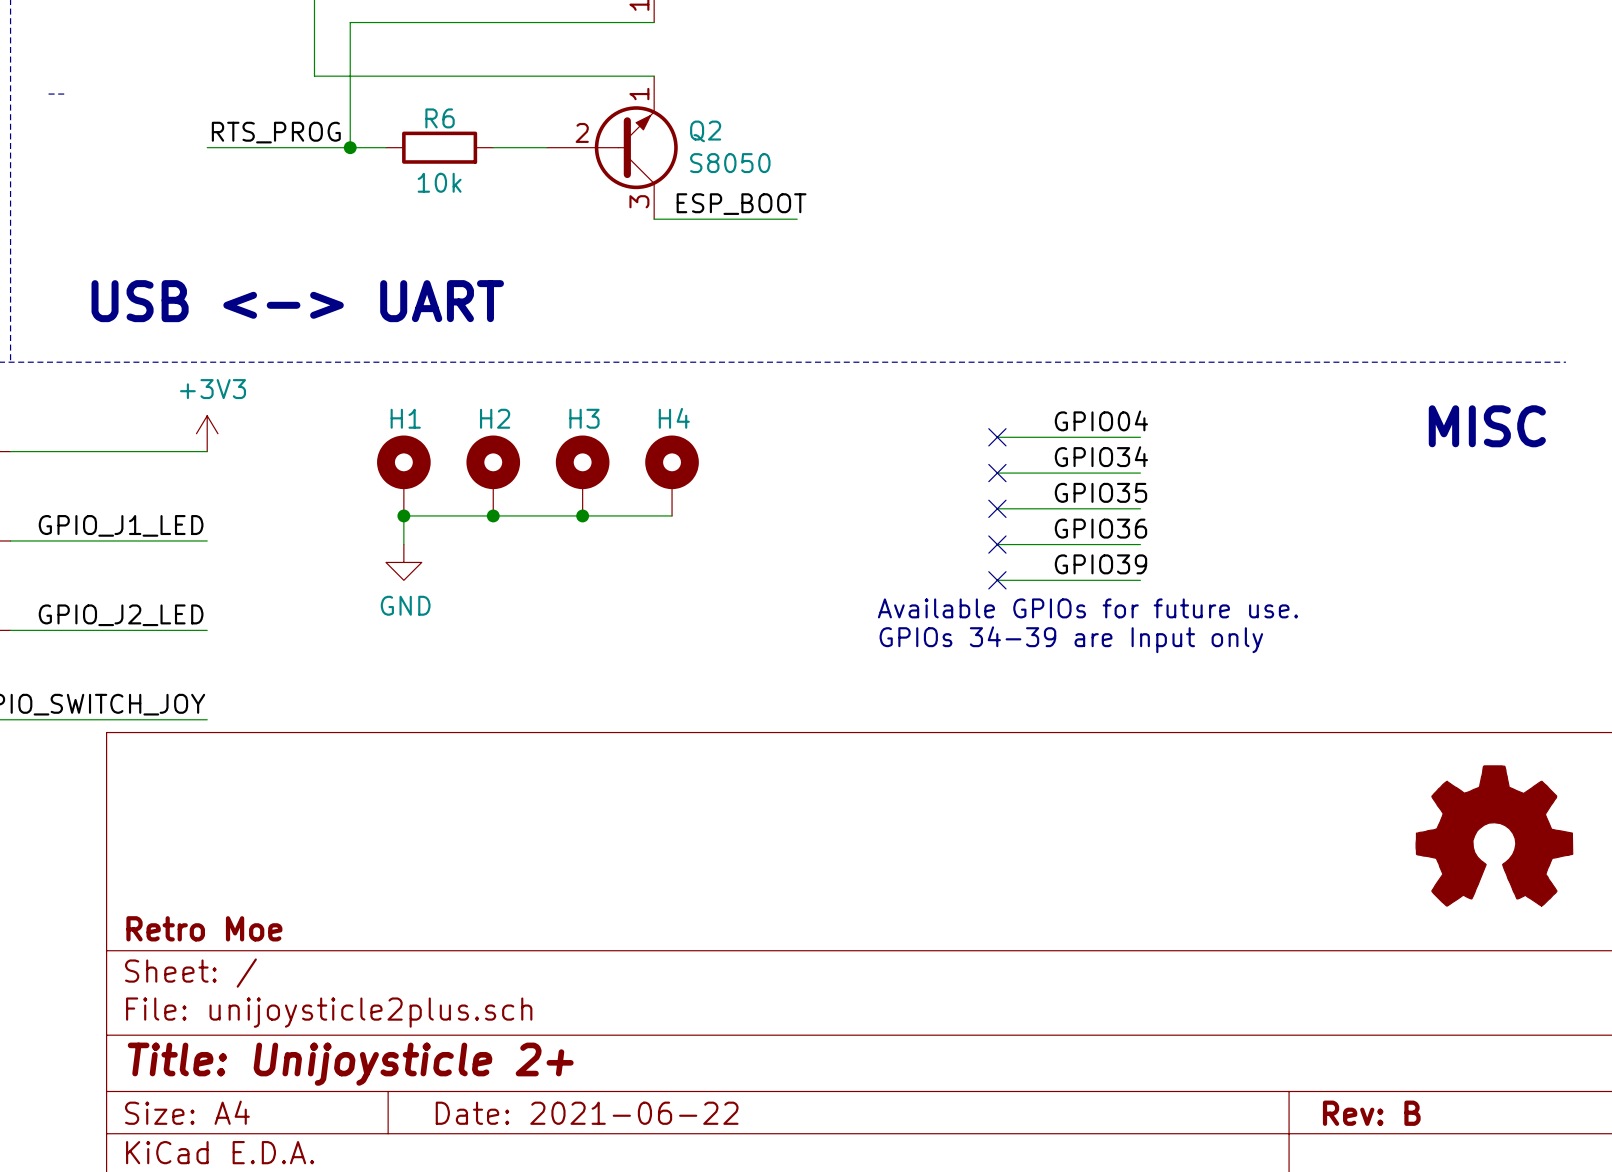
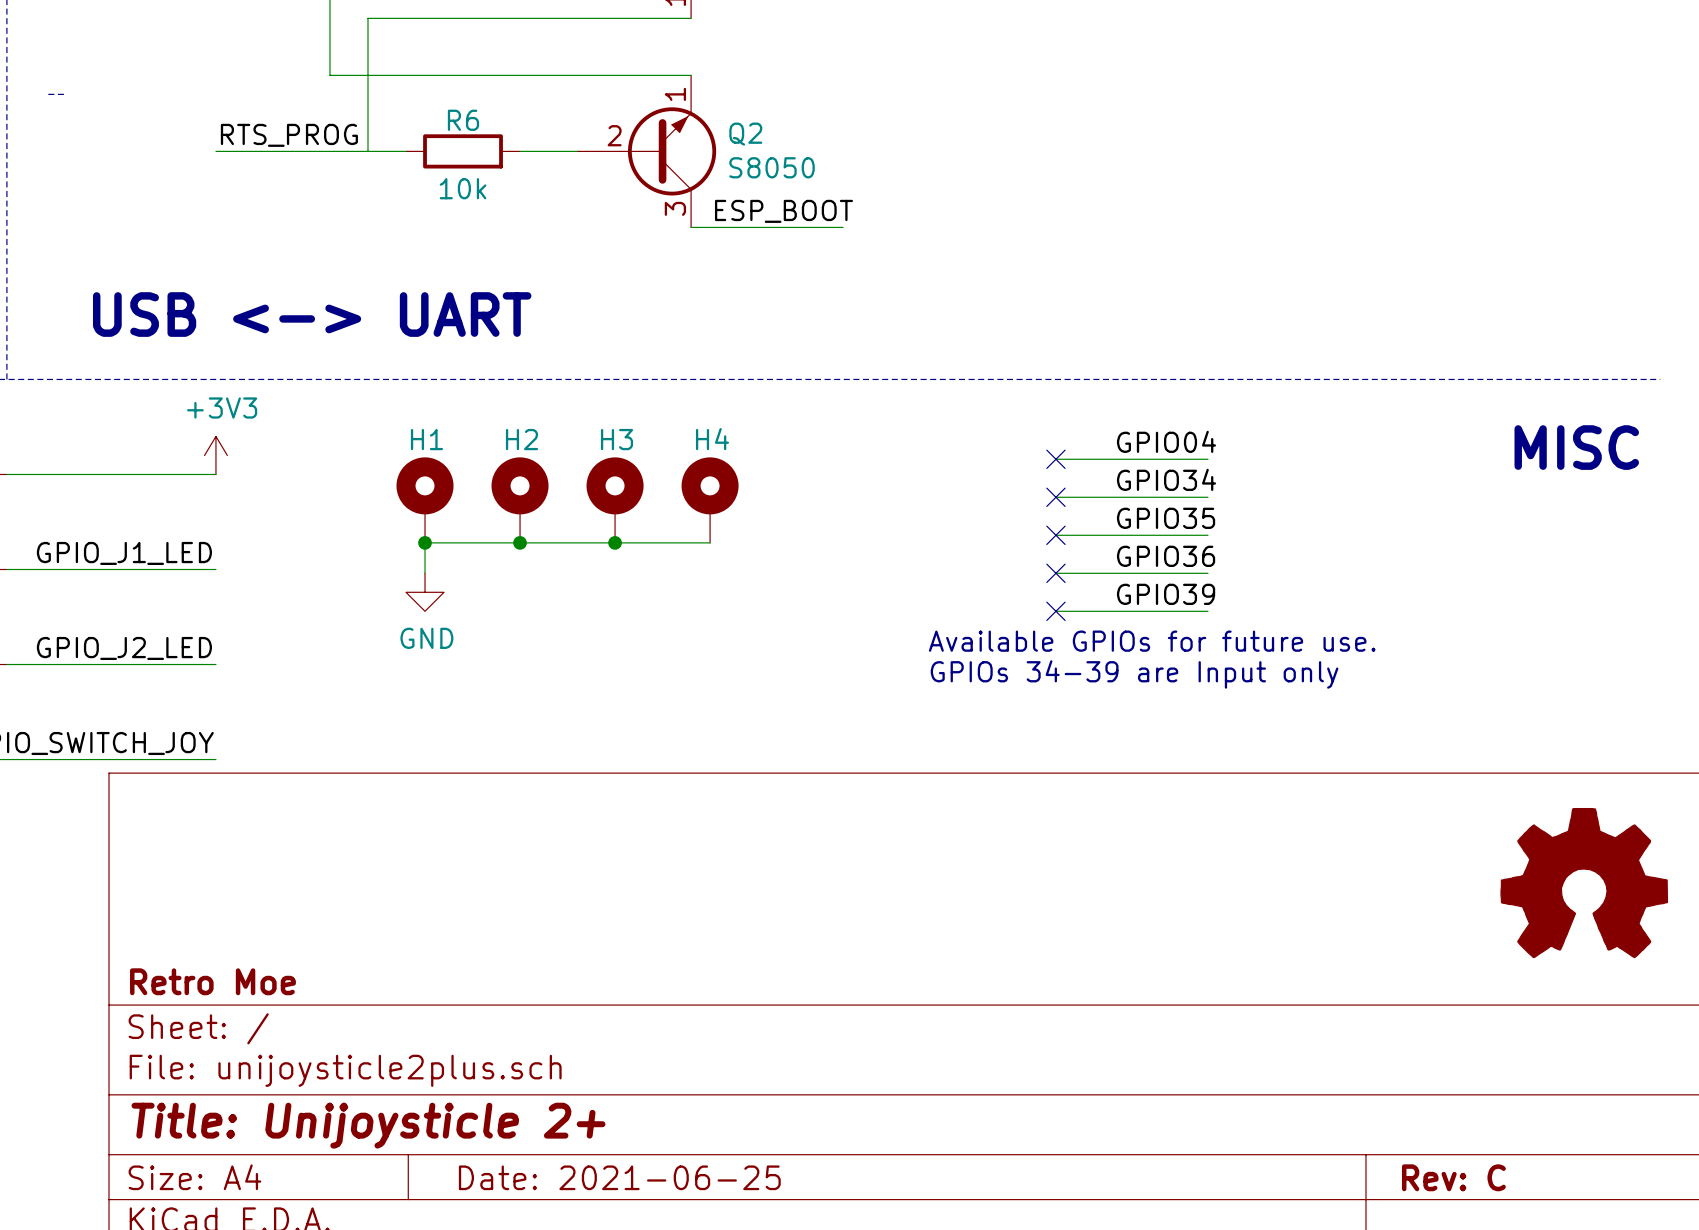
junction: (350, 147) -> none
title block: Date: 2021-06-22 (587, 1113) -> Date: 2021-06-25 (619, 1177)
title block: Rev: B (1371, 1113) -> Rev: C (1453, 1177)

